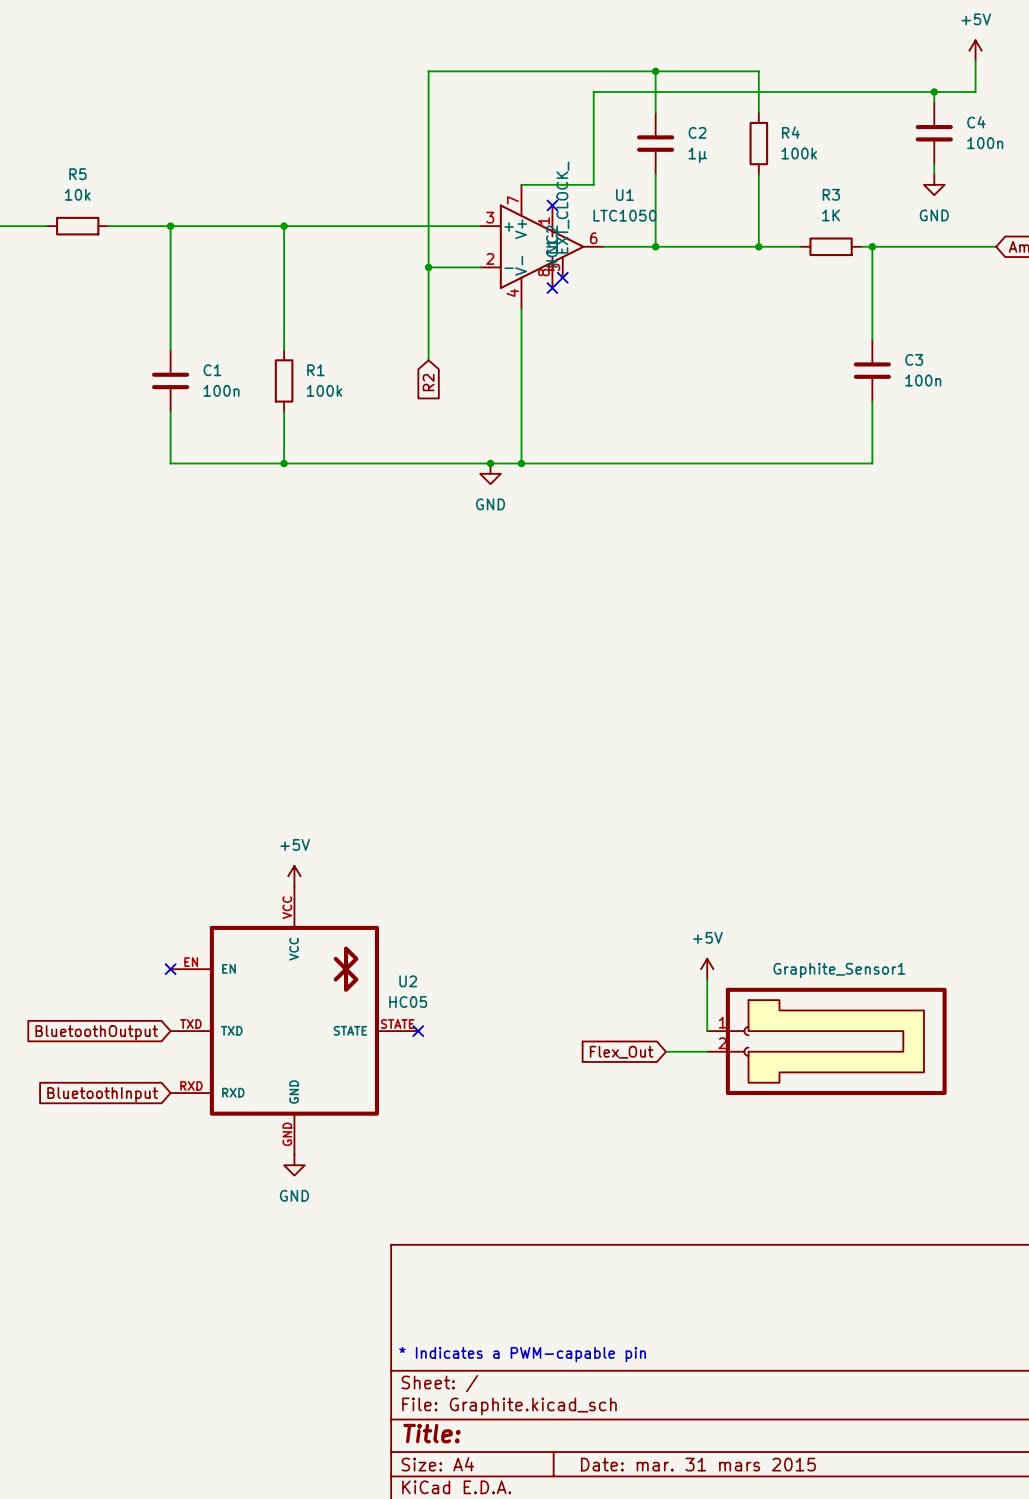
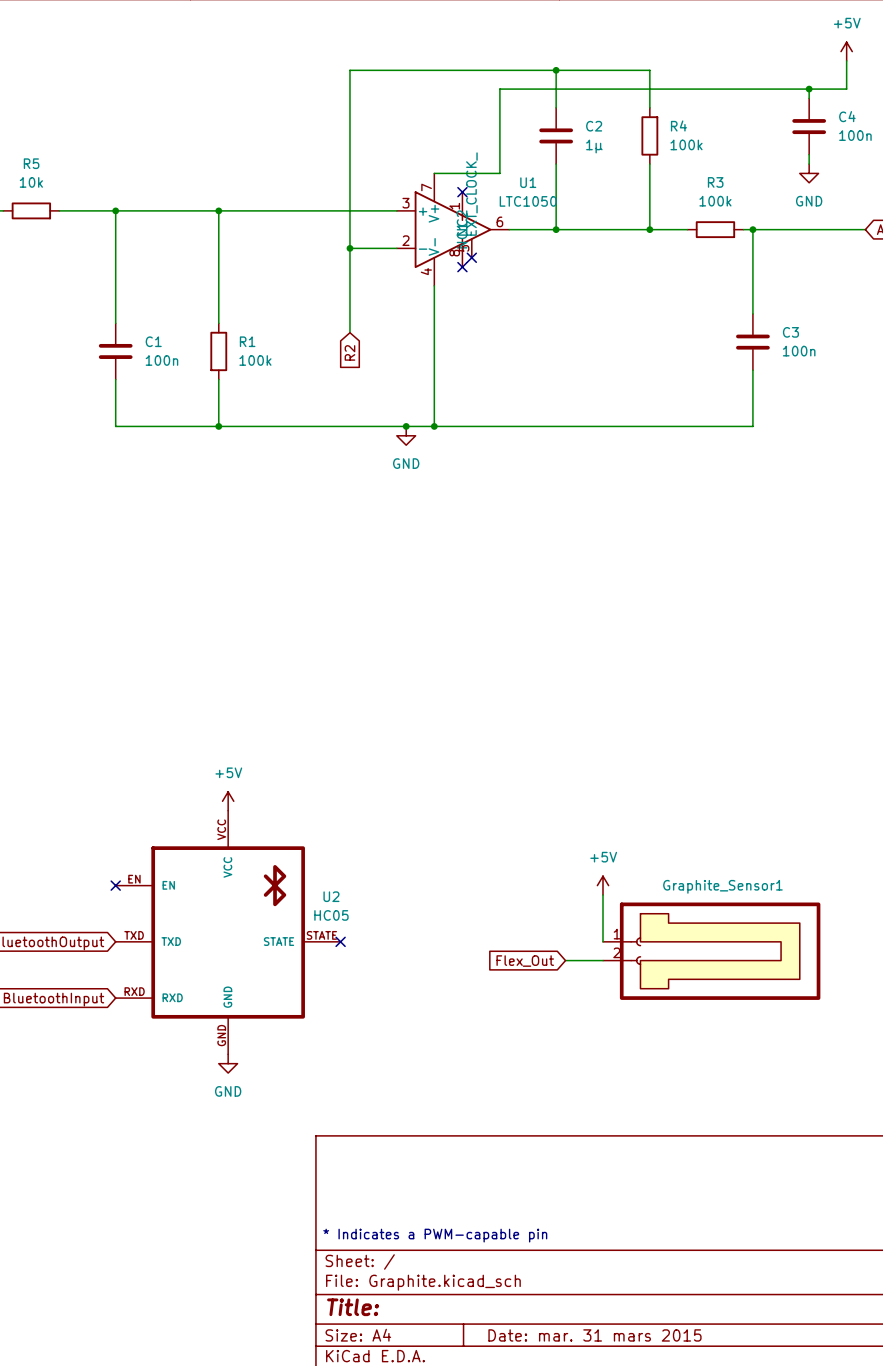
R3 value: 1K (831, 215) -> 100k (715, 201)

